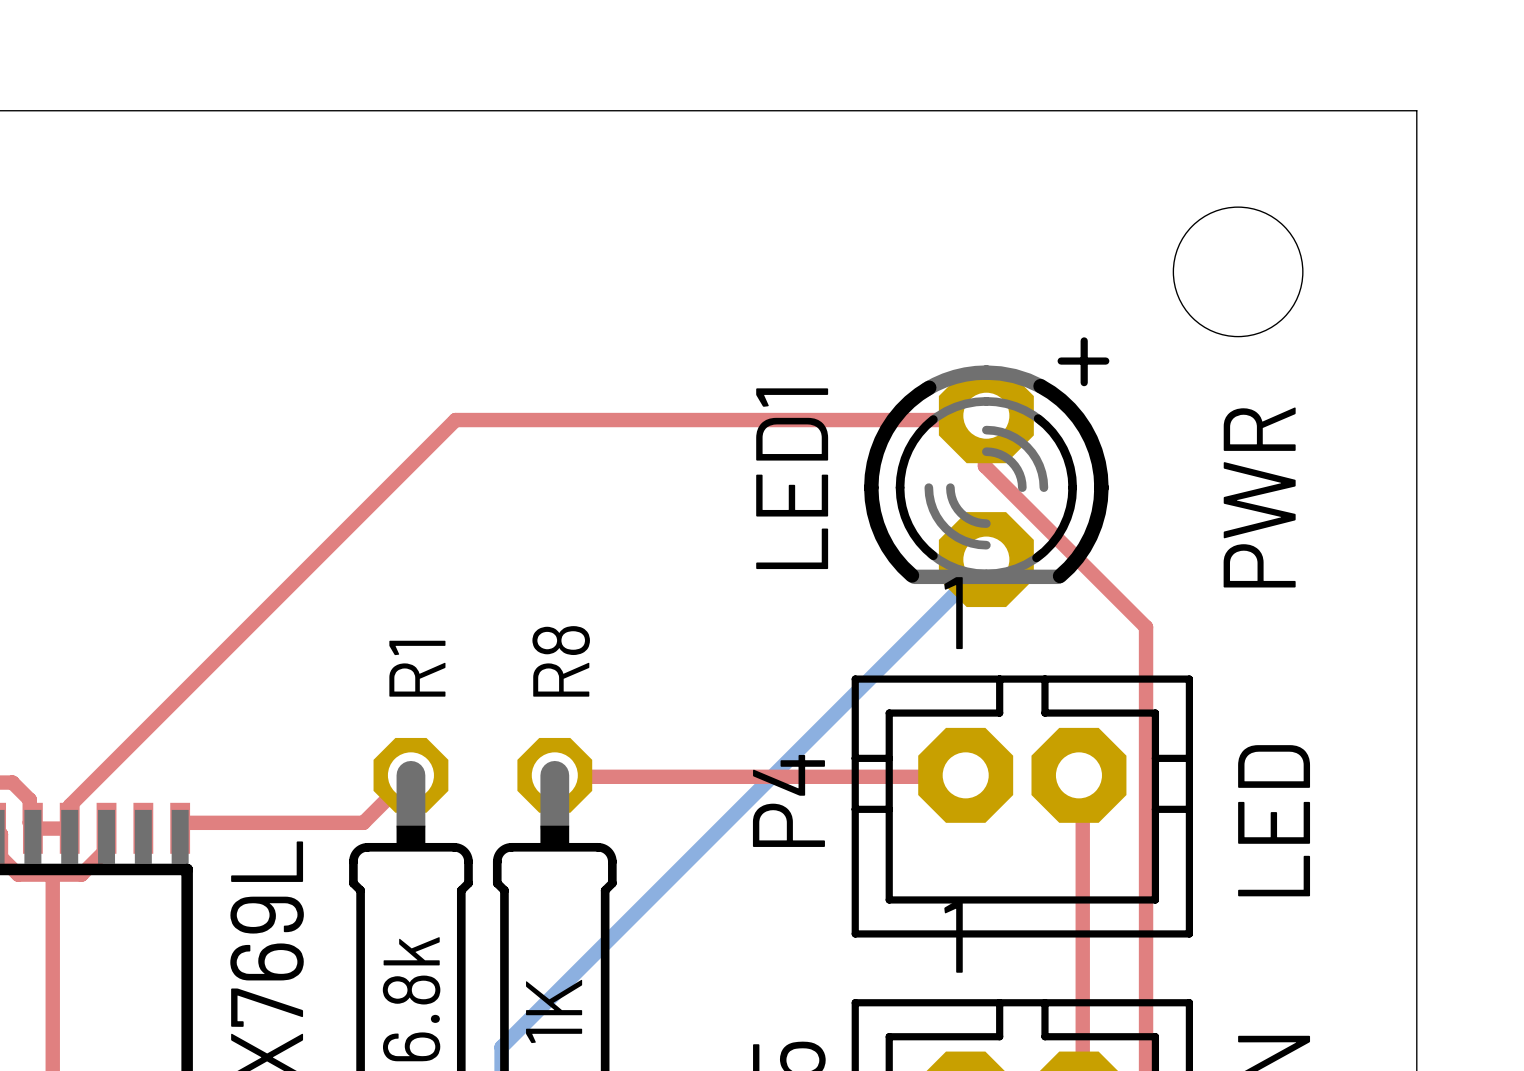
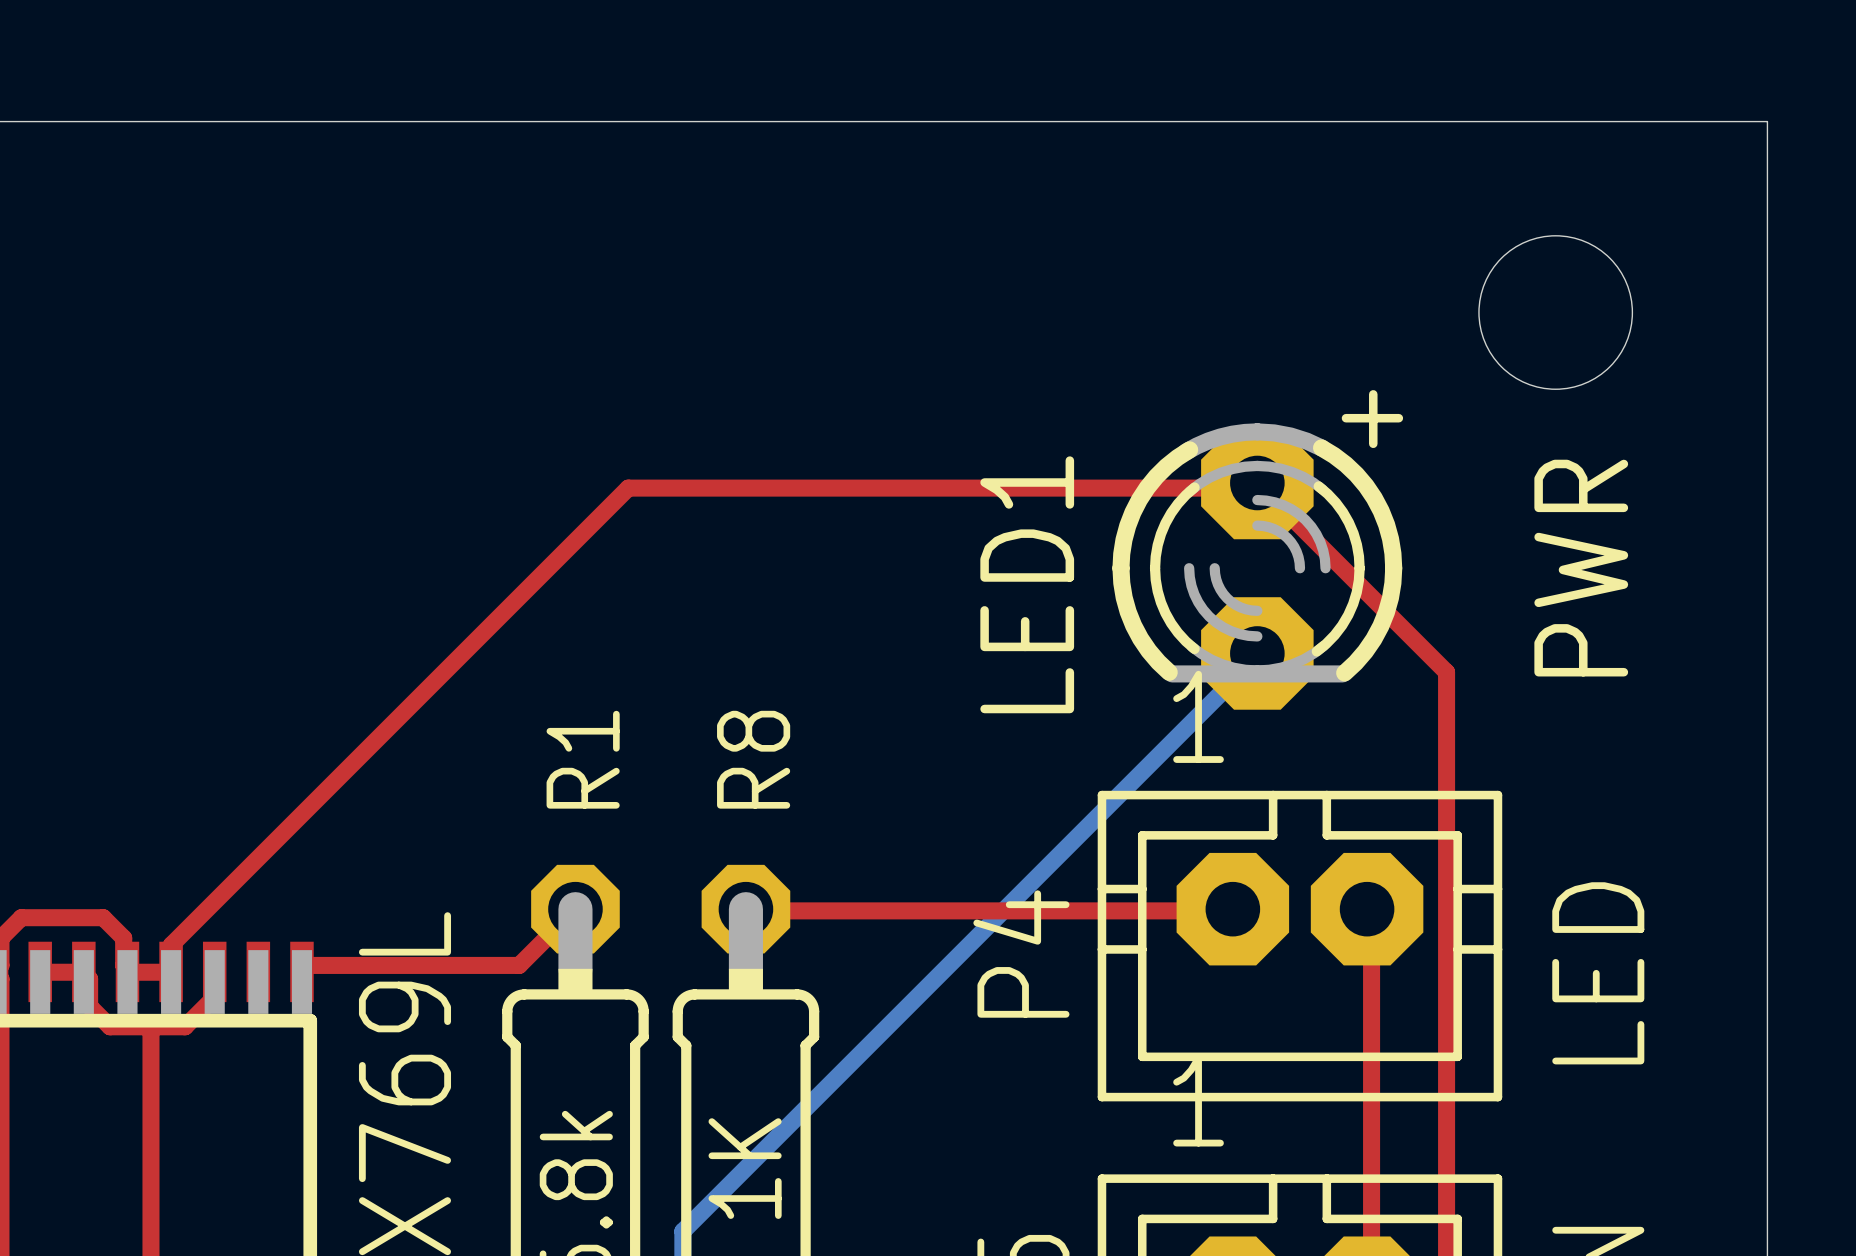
top track: (986, 415) (984, 466) (1146, 627) -> (1257, 482) (1446, 672) (1446, 733)

